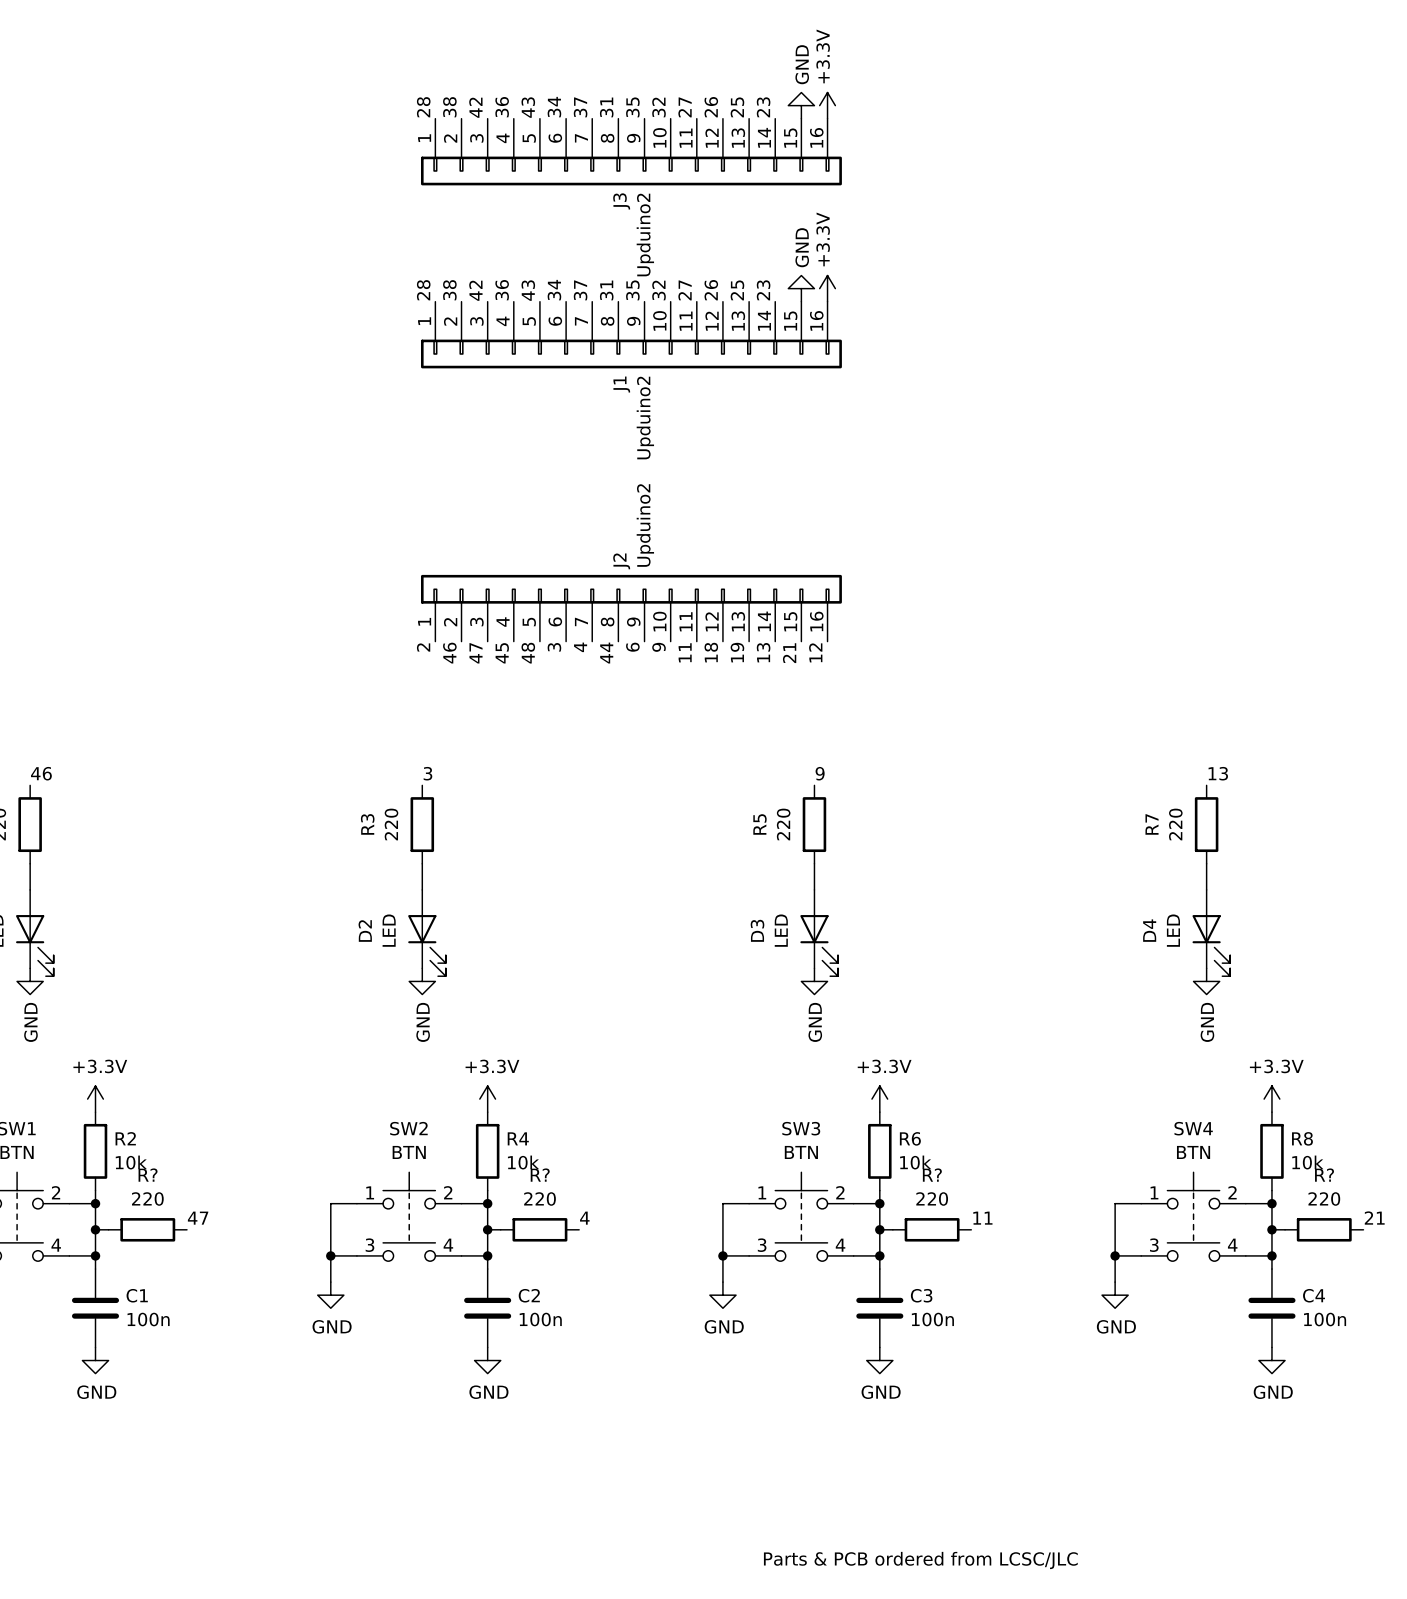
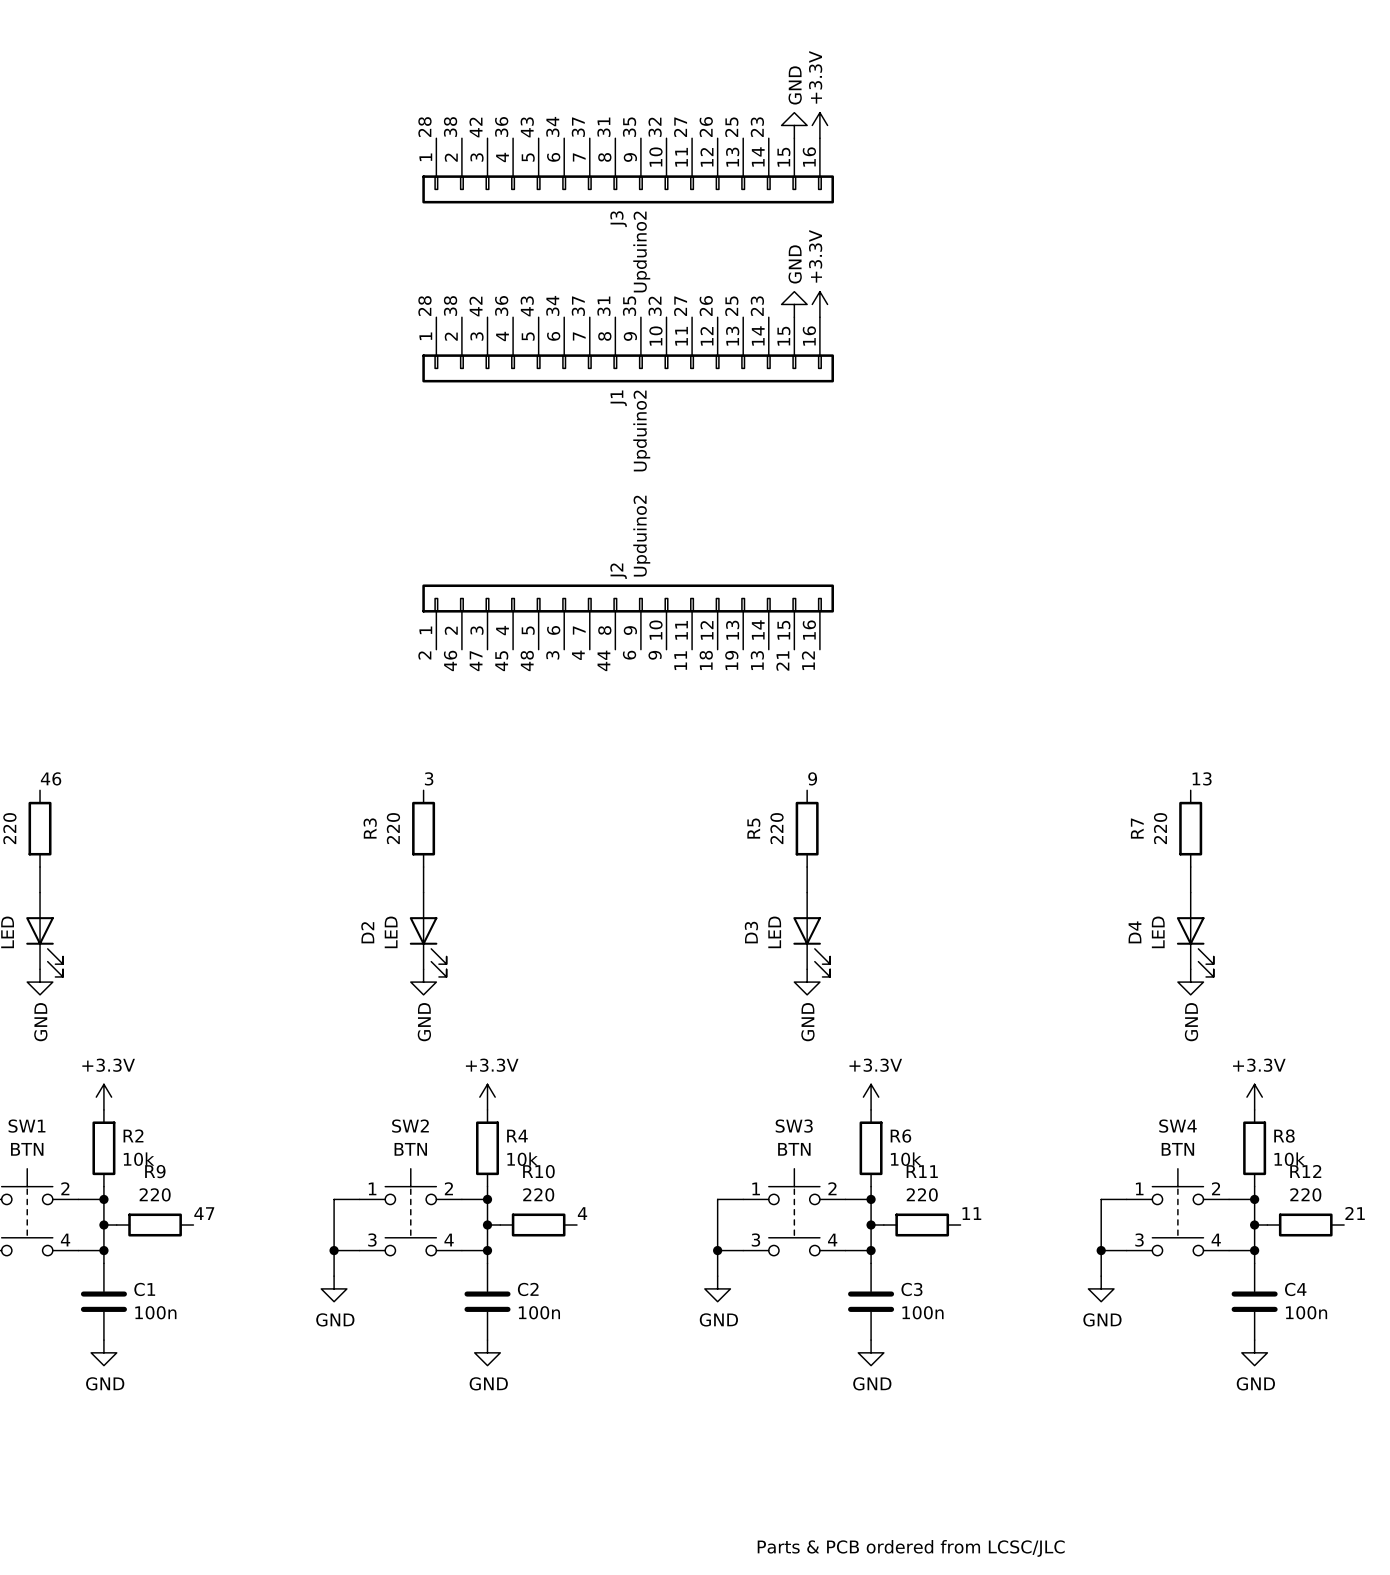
R? name: R? (148, 1175) -> R9 (155, 1171)
R? name: R? (540, 1175) -> R10 (538, 1171)
R? name: R? (932, 1175) -> R11 (922, 1171)
R? name: R? (1324, 1175) -> R12 (1305, 1171)

